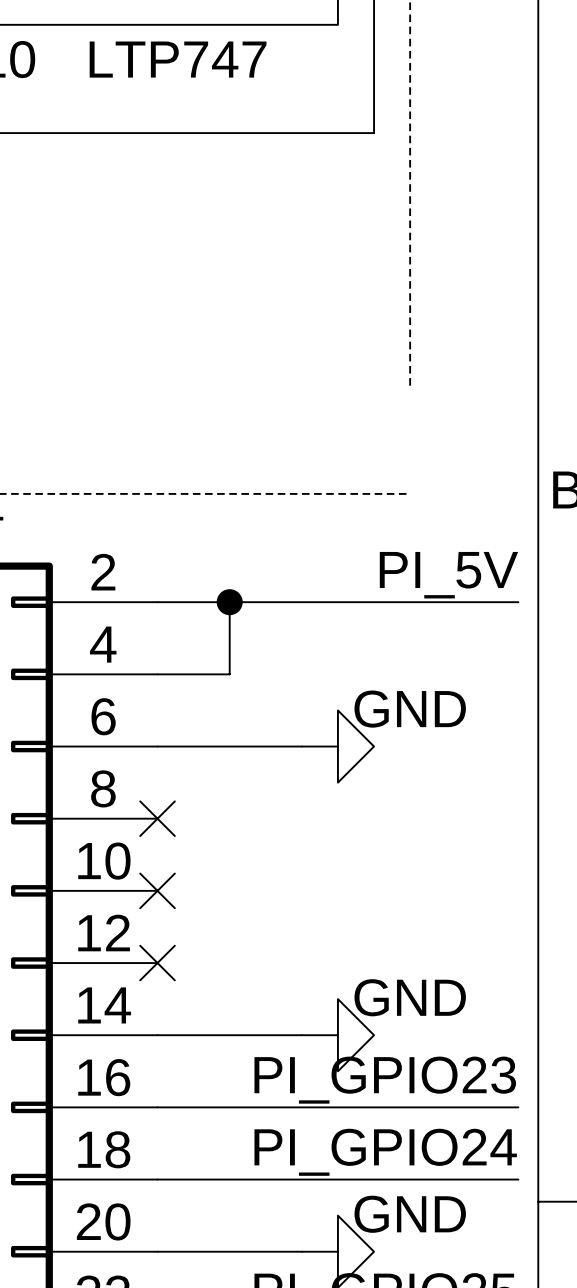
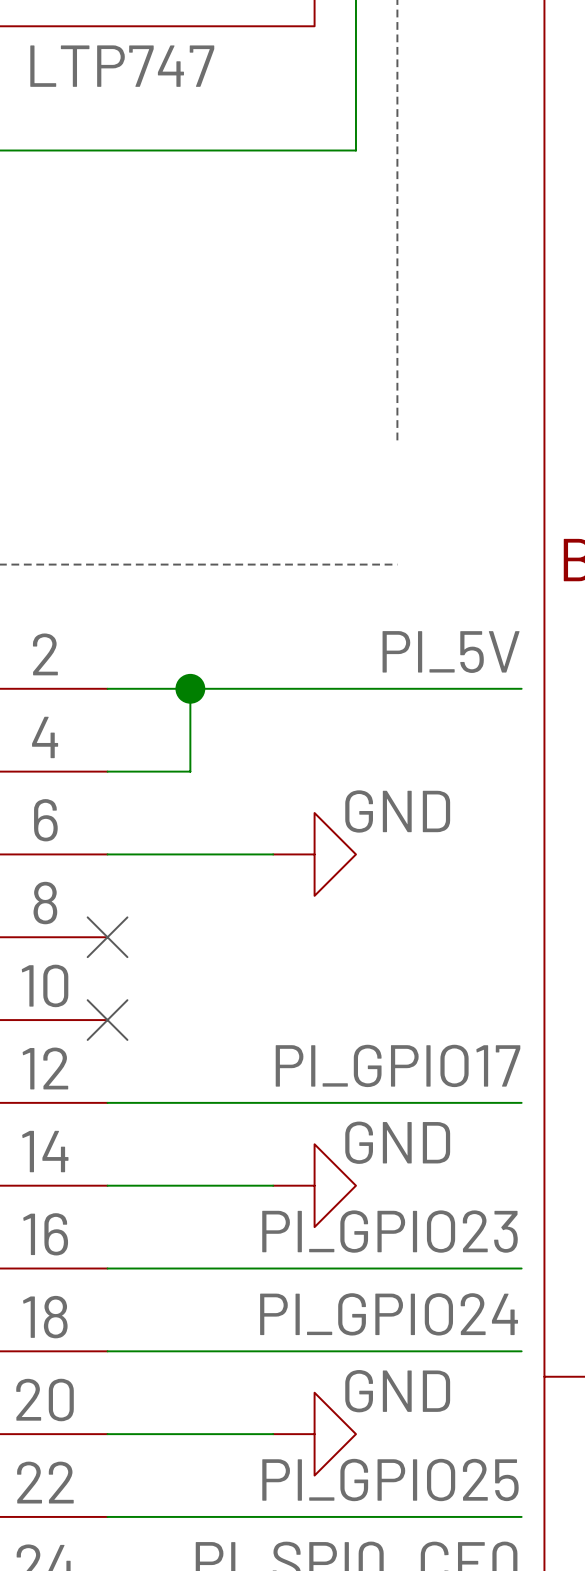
label: none -> PI_GPIO17 (398, 1065)
wire: none -> (107, 1102) (521, 1102)
no-connect mark: (157, 963) -> none

